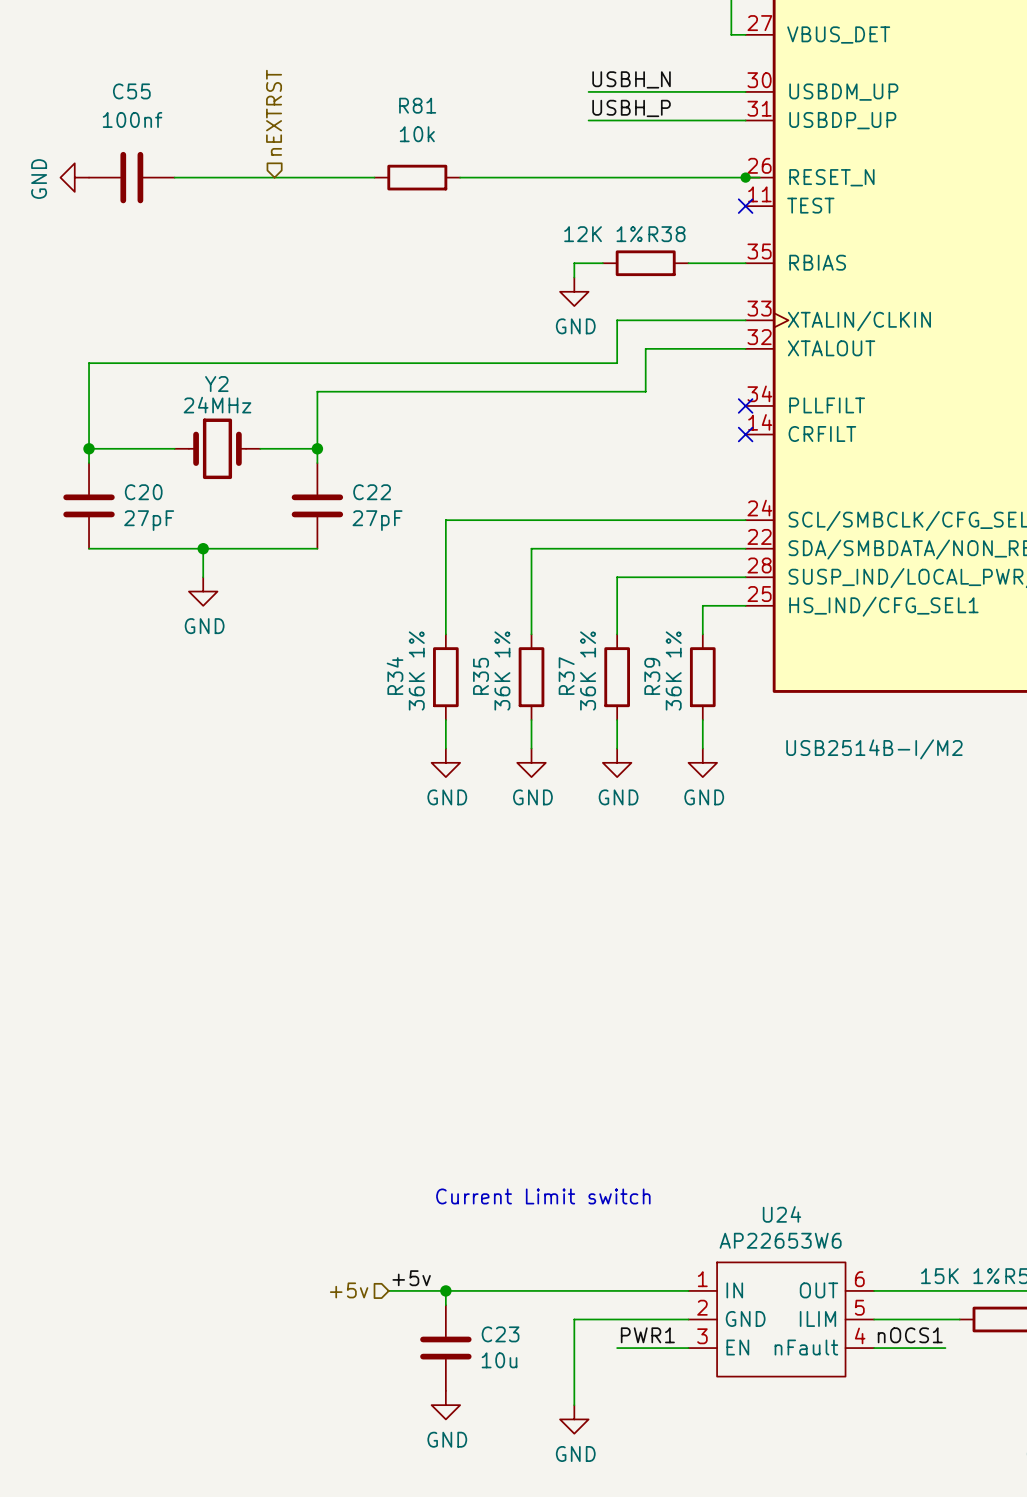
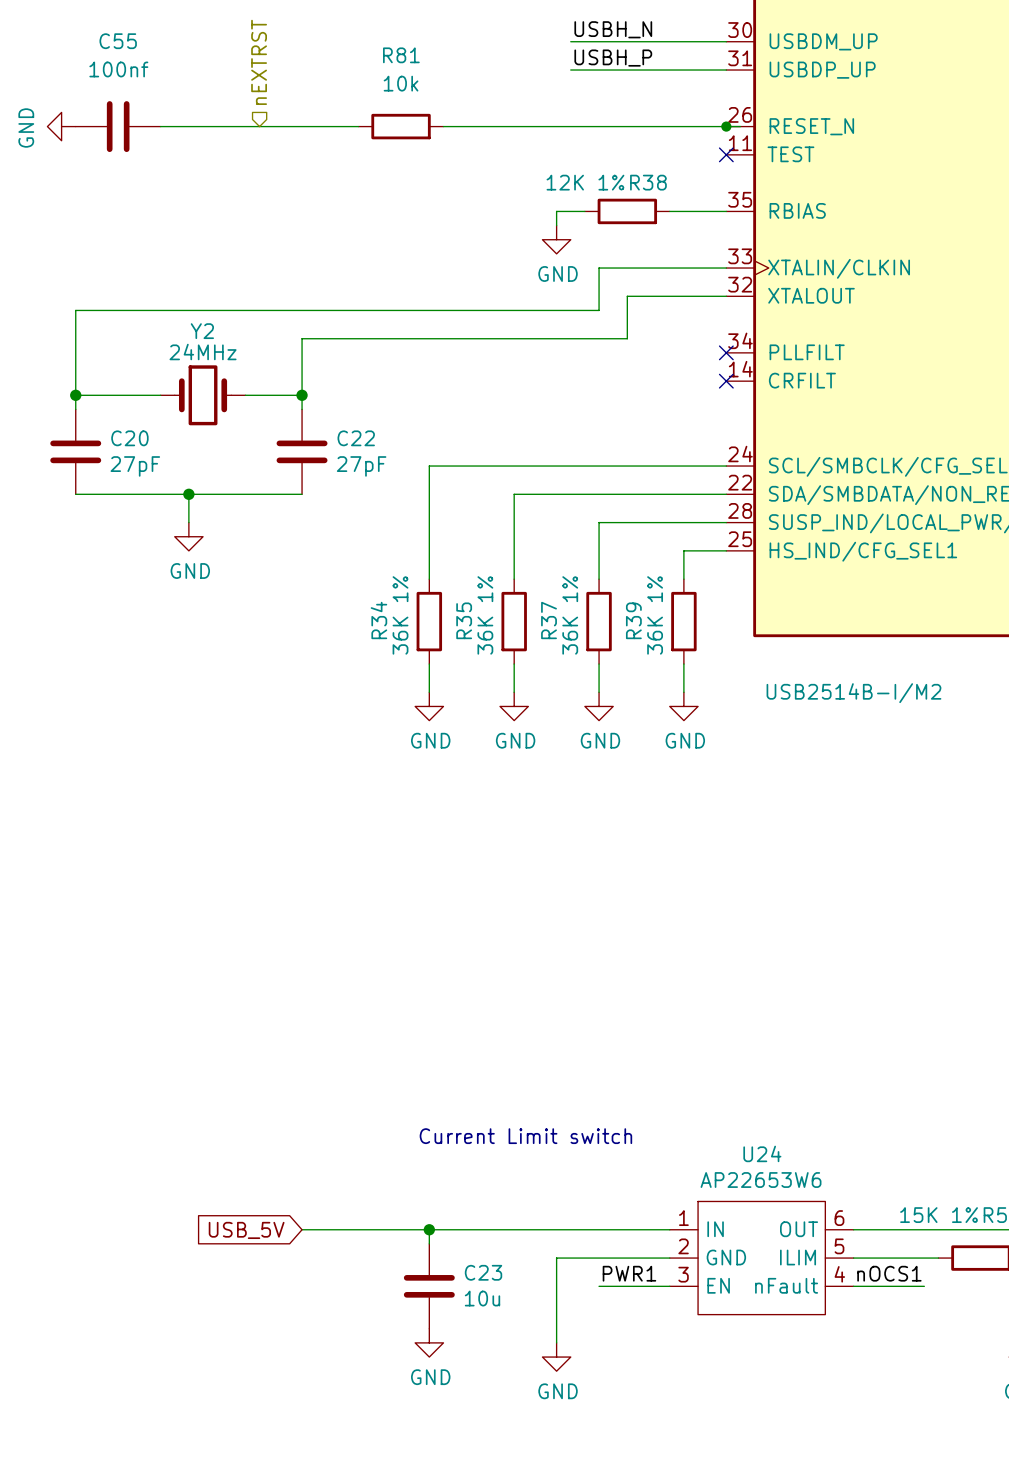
label: +5v (411, 1278) -> none
wire: none -> (302, 1229) (372, 1229)
hierarchical label: +5v (349, 1290) -> none
global label: none -> USB_5V (246, 1230)

